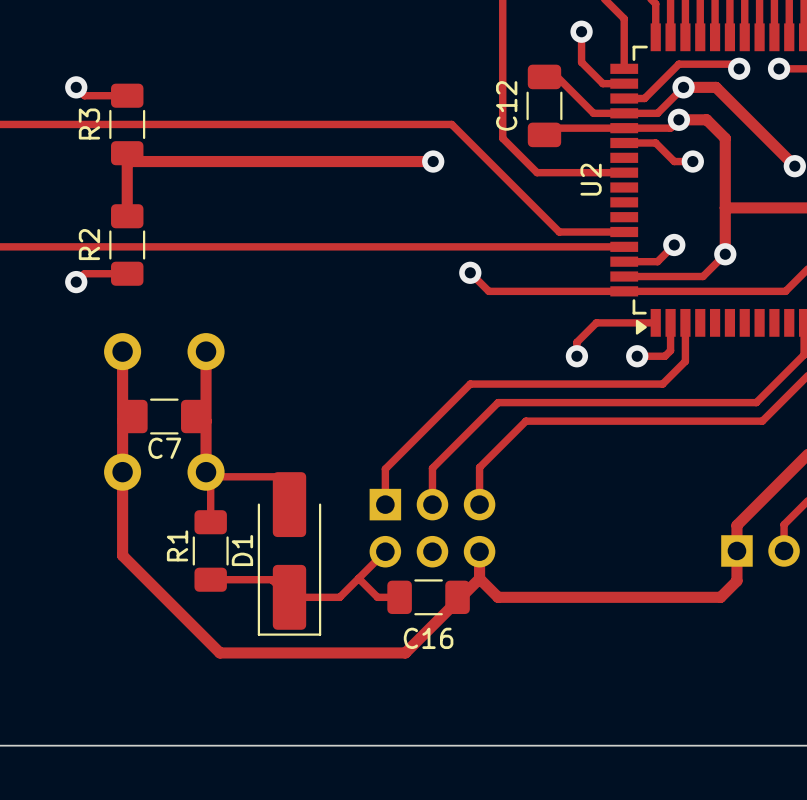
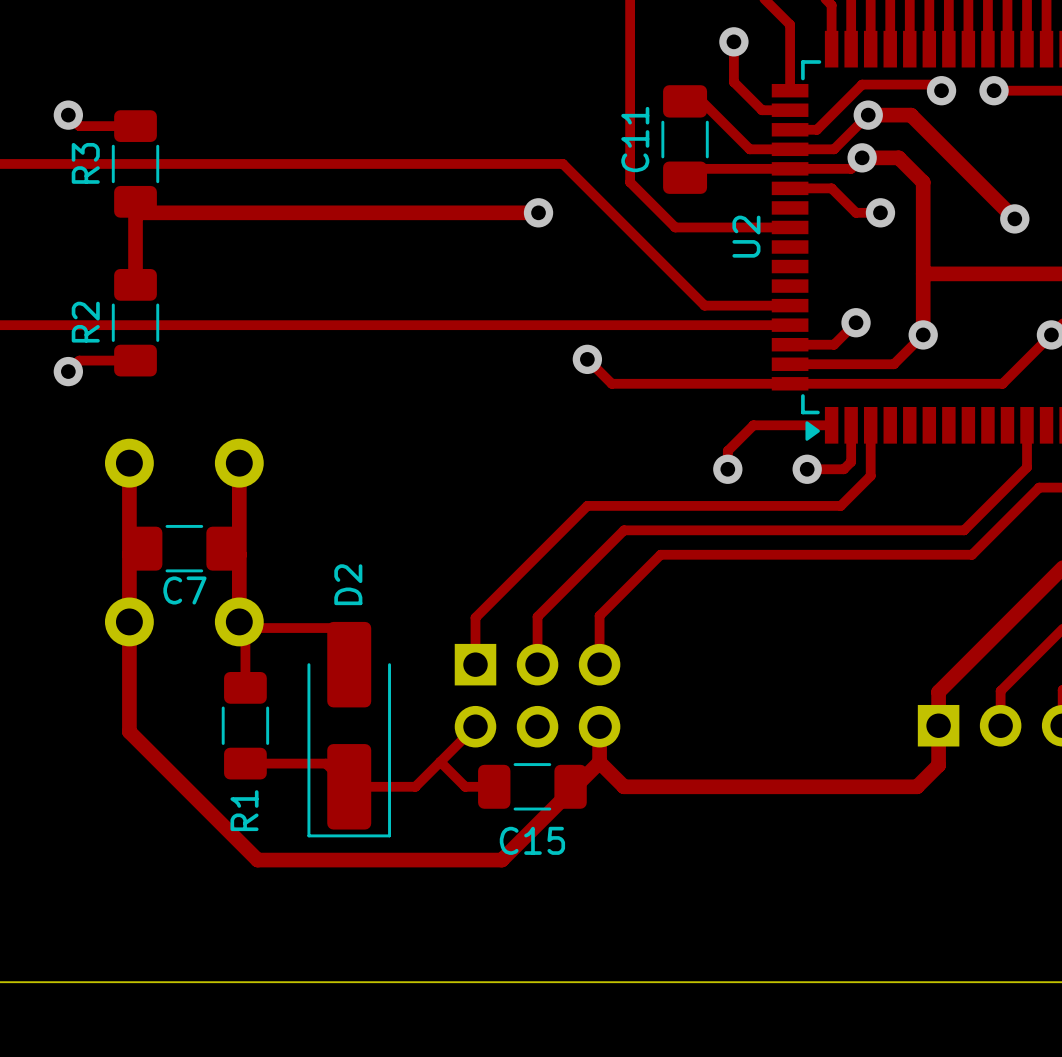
C12 name: C12 (506, 105) -> C11 (635, 139)
R1 name position: R1 (177, 545) -> R1 (244, 810)
D1 name: D1 (242, 550) -> D2 (348, 584)
C16 name: C16 (428, 638) -> C15 (532, 840)

